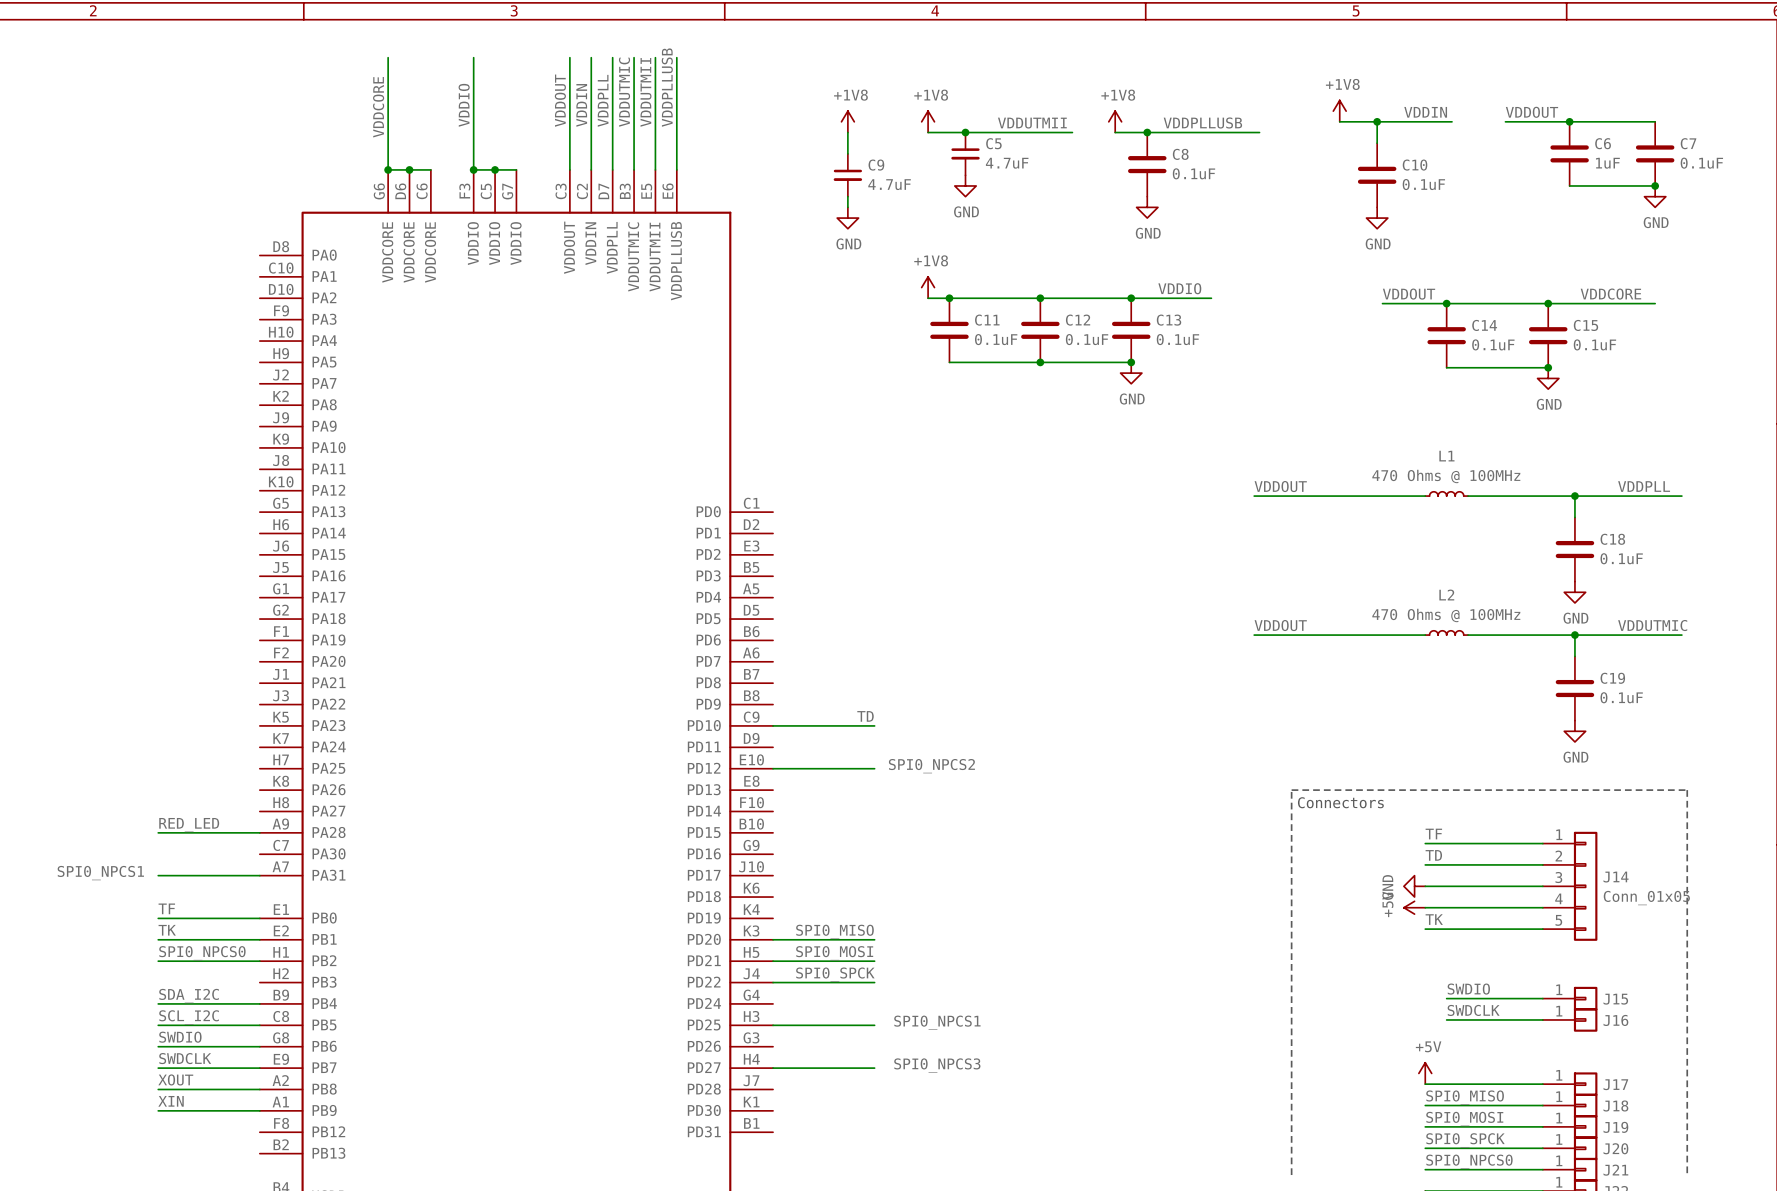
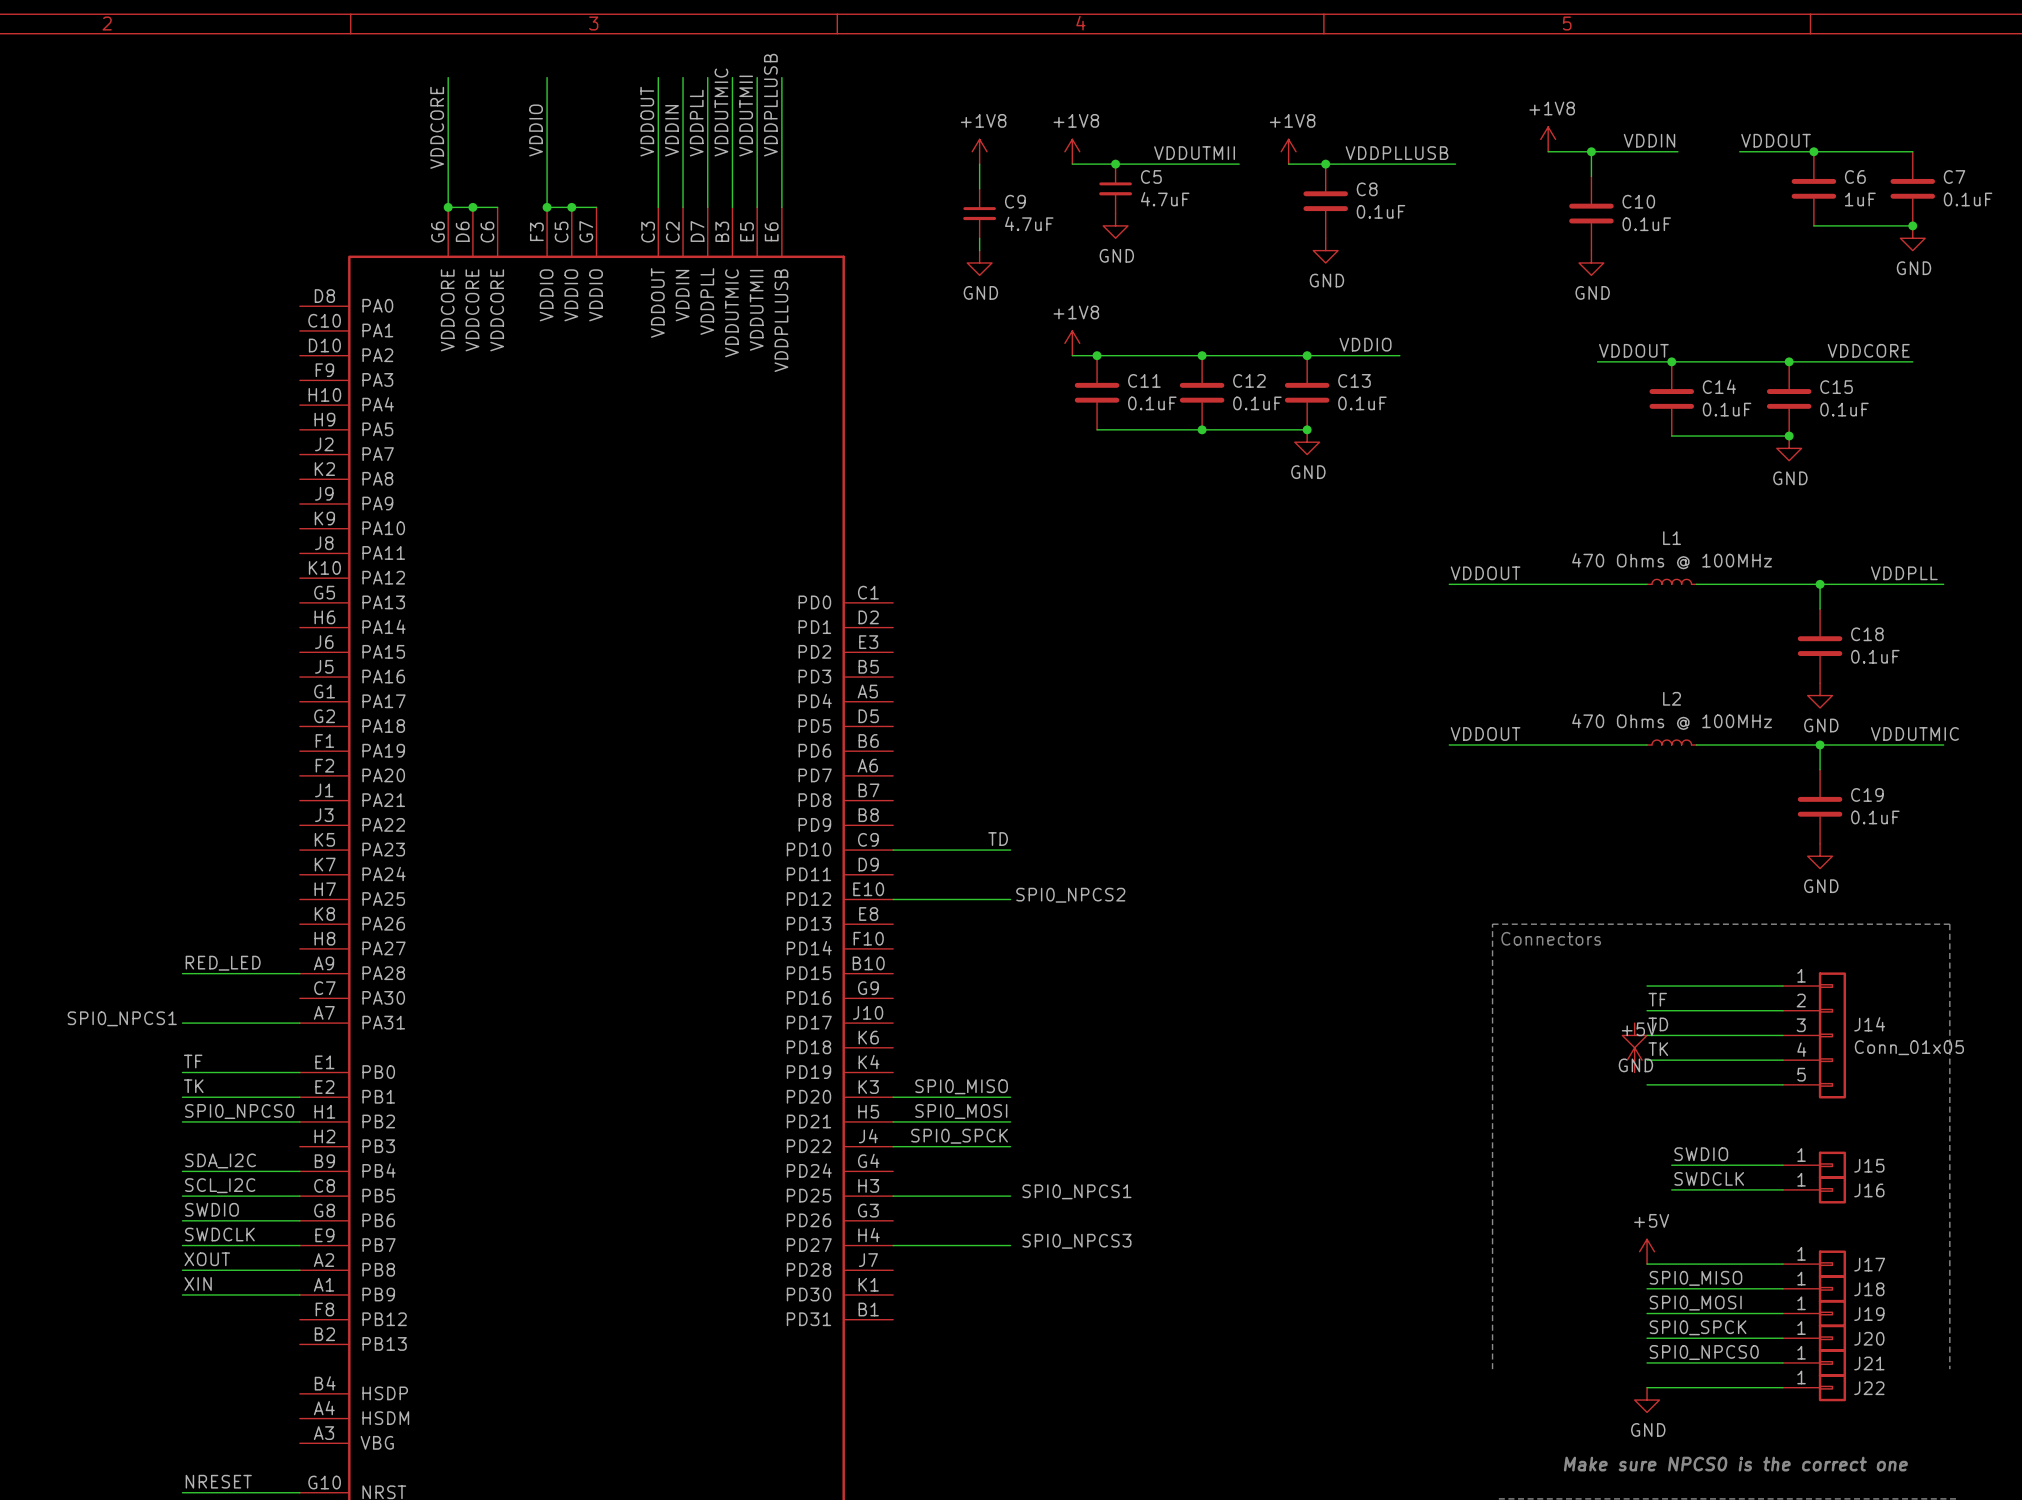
label: TF (1433, 834) -> none
label: TD (1433, 855) -> TF (1657, 999)
label: none -> TD (1658, 1024)
power symbol rotation: 0° (1414, 886) -> 90° counterclockwise (1634, 1035)
power symbol rotation: 0° (1414, 907) -> 90° clockwise (1634, 1060)
label position: TK (1434, 919) -> TK (1658, 1049)

